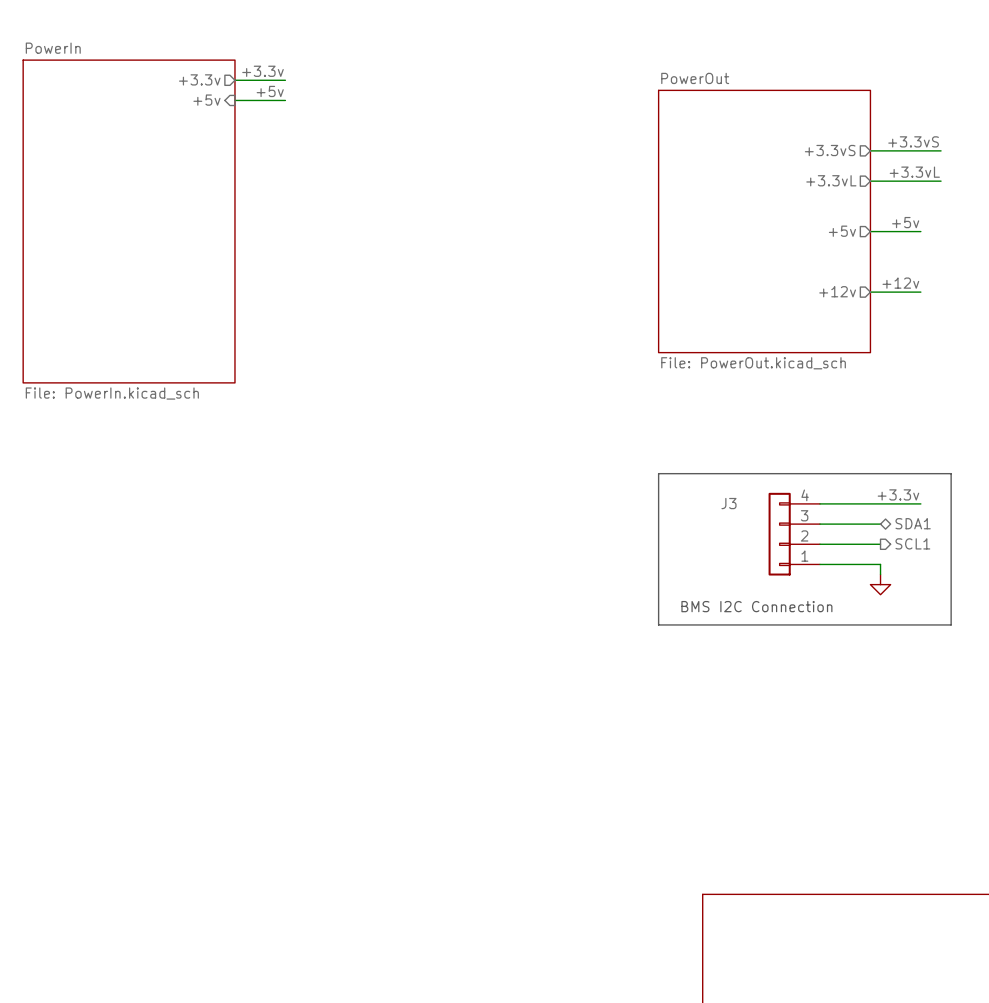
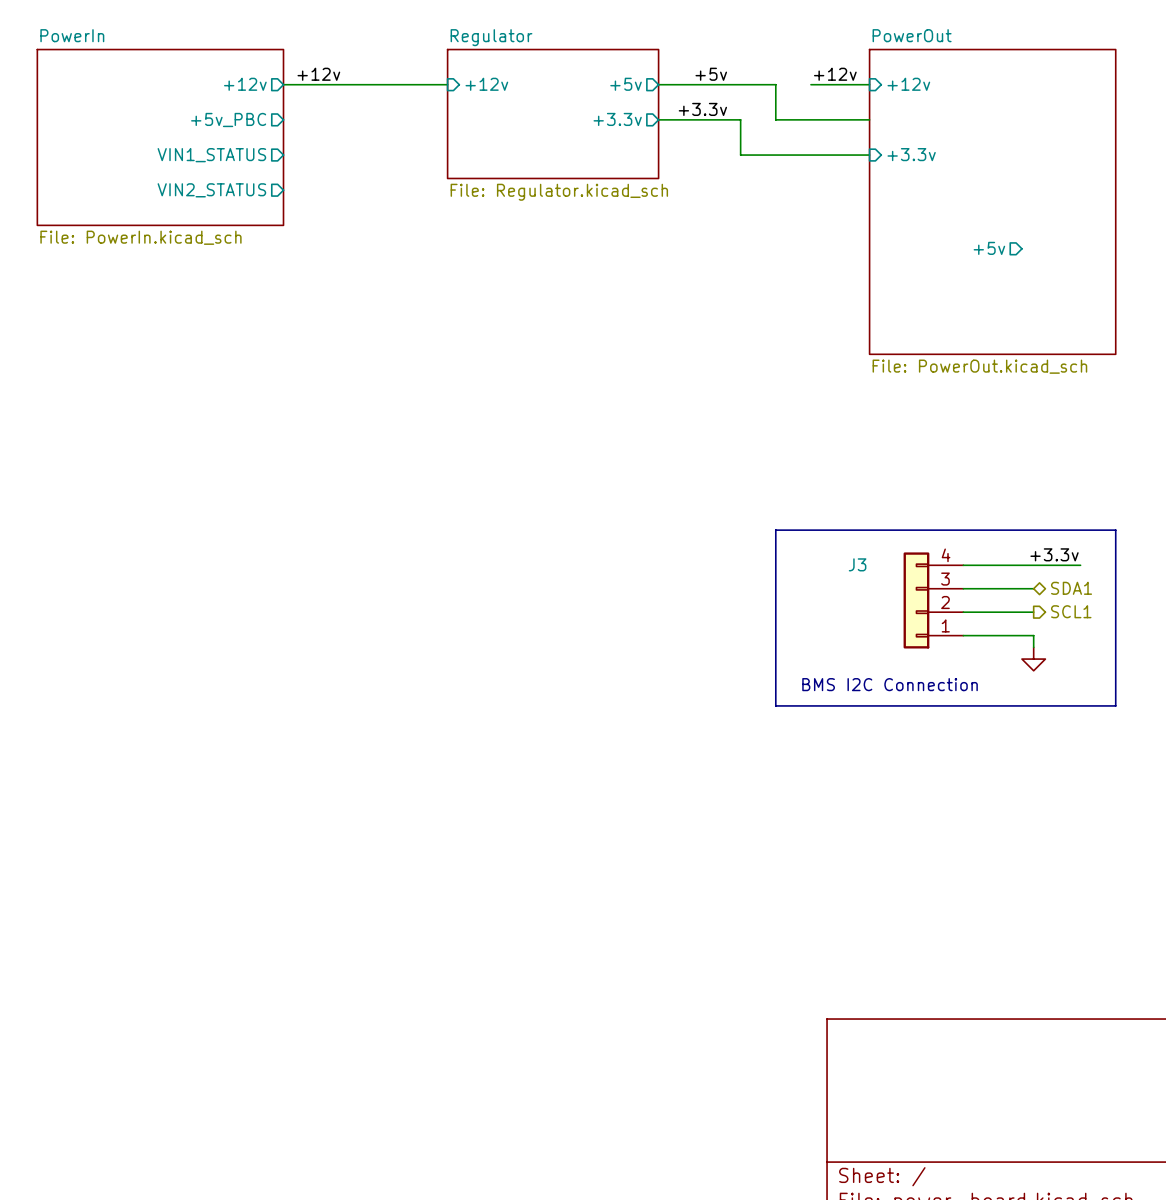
label: +3.3v (263, 71) -> none
sheet pin: +3.3v (199, 79) -> none
wire: (234, 80) (285, 80) -> none
label: none -> +12v (318, 74)
label: none -> +5v (711, 74)
label: none -> +12v (835, 74)
sheet pin: none -> +12v (245, 84)
sheet pin: none -> +12v (486, 84)
sheet pin: none -> +5v (626, 84)
sheet pin: none -> +12v (908, 84)
wire: none -> (283, 84) (447, 84)
wire: none -> (658, 84) (775, 84) (775, 119) (869, 119)
label: +5v (270, 91) -> none
sheet pin: +5v (206, 100) -> none
wire: (234, 100) (285, 100) -> none
label: none -> +3.3v (702, 109)
sheet Regulator: none -> File: Regulator.kicad_sch (553, 114)
sheet pin: none -> +5v_PBC (228, 119)
sheet pin: none -> +3.3v (617, 119)
wire: none -> (658, 119) (740, 119) (740, 155) (869, 155)
sheet PowerIn: none -> File: PowerIn.kicad_sch (160, 137)
label: +3.3vS (913, 141) -> none
sheet pin: none -> VIN1_STATUS (211, 155)
sheet pin shape: output (830, 150) -> input (911, 154)
sheet pin: +3.3vS (830, 150) -> +3.3v (911, 154)
wire: (870, 150) (941, 150) -> none
label: +3.3vL (914, 172) -> none
sheet pin: +3.3vL (831, 180) -> none
sheet pin: none -> VIN2_STATUS (211, 190)
wire: (870, 181) (941, 181) -> none
sheet PowerIn: File: PowerIn.kicad_sch (129, 221) -> none
sheet PowerOut position: (764, 221) -> (992, 201)
label: +5v (905, 222) -> none
wire: (870, 231) (920, 231) -> none
label: +12v (900, 283) -> none
sheet pin: +12v (837, 291) -> none
wire: (870, 292) (920, 292) -> none

